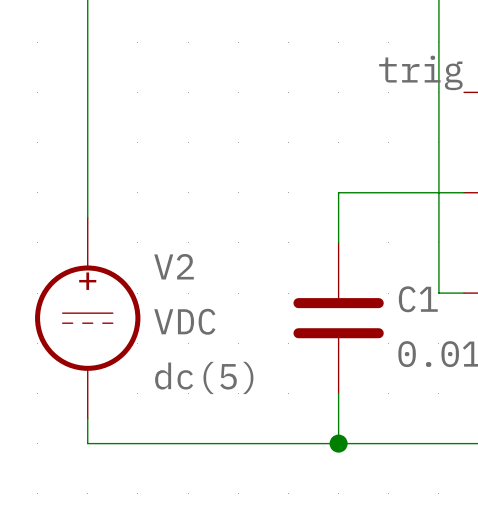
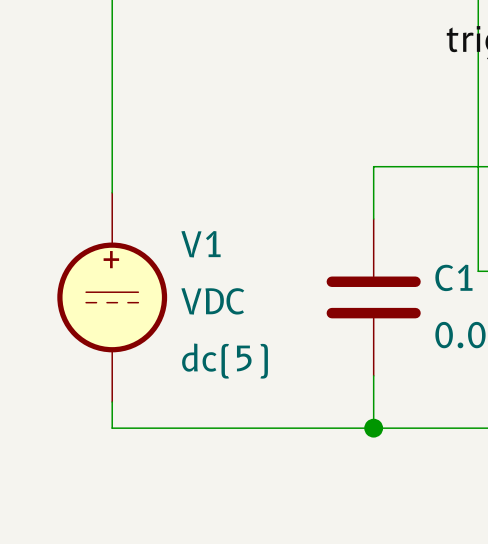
V2 name: V2 (174, 266) -> V1 (200, 244)

